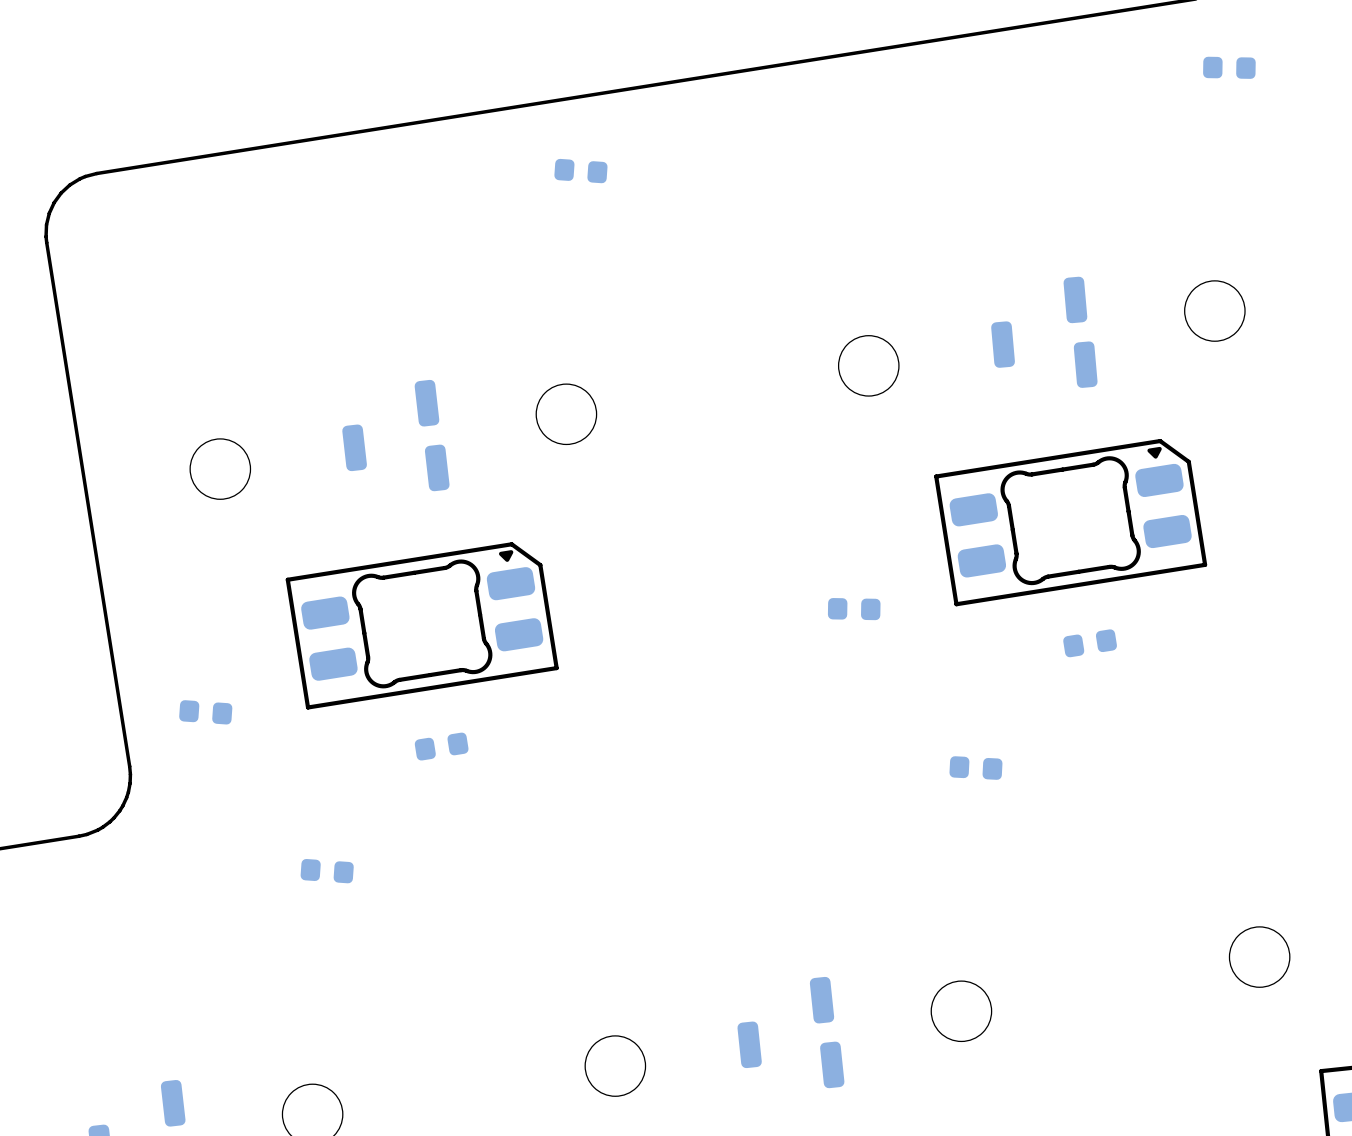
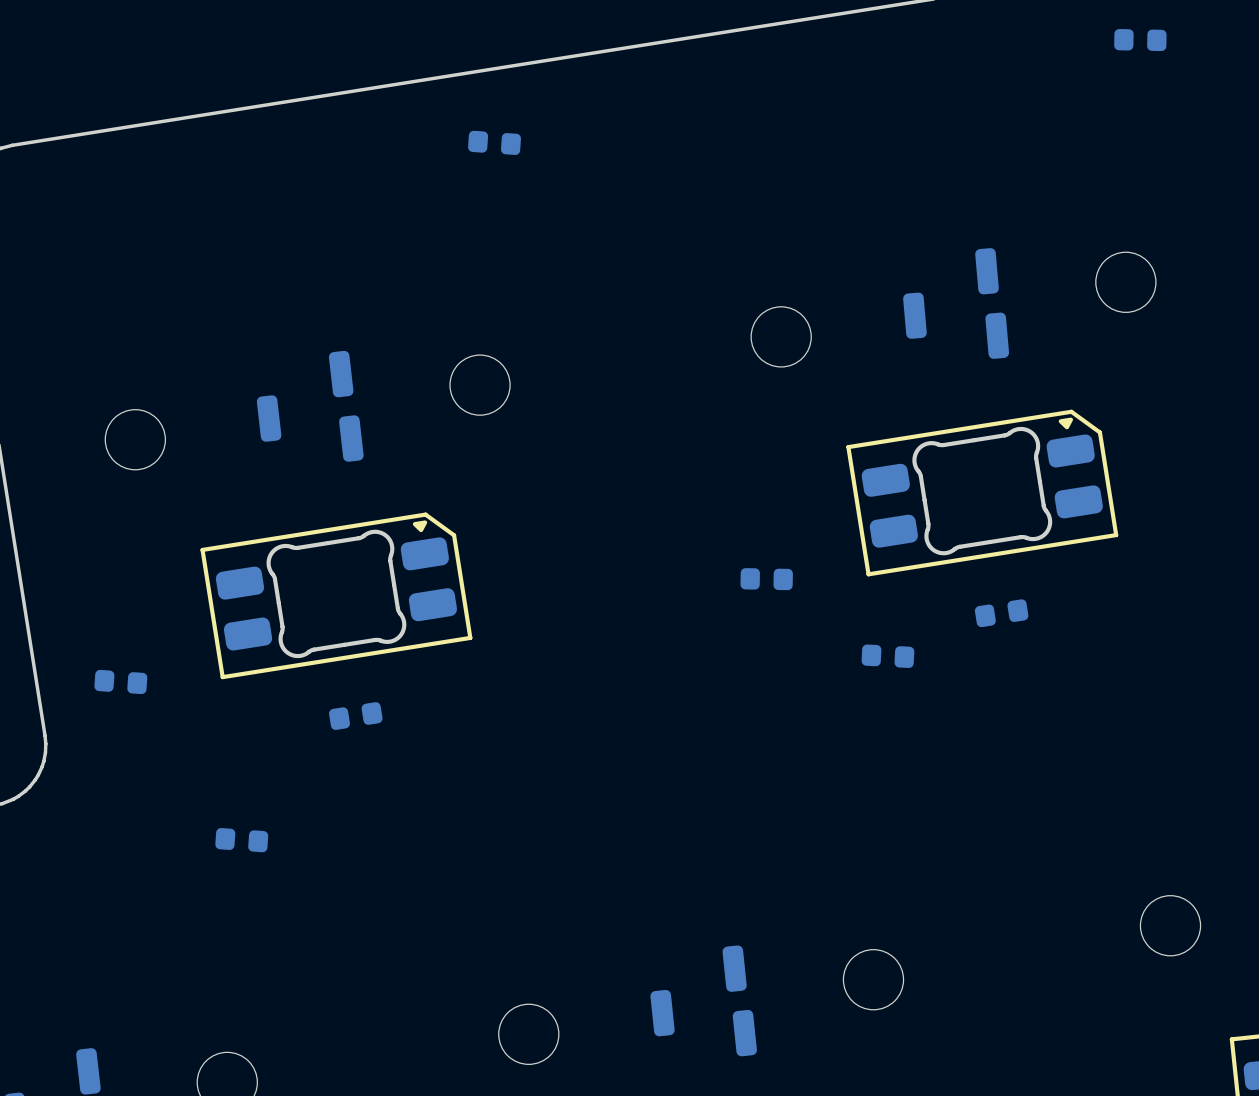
part position: (975, 768) -> (887, 656)

